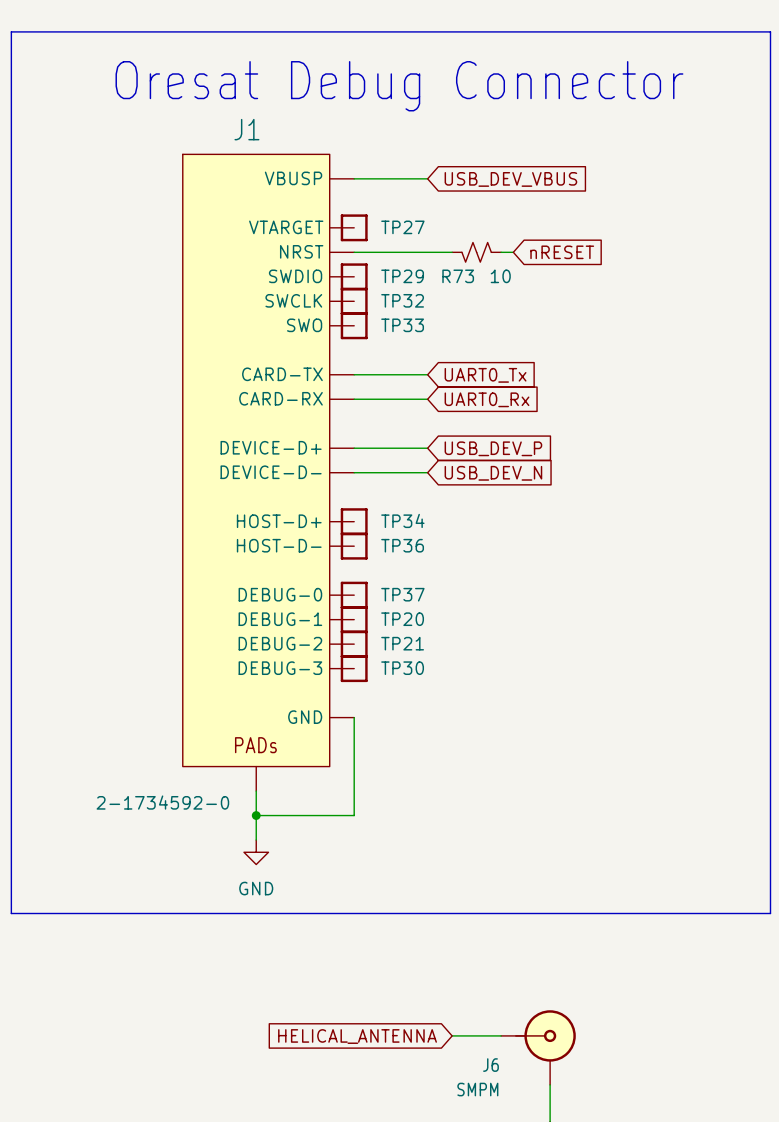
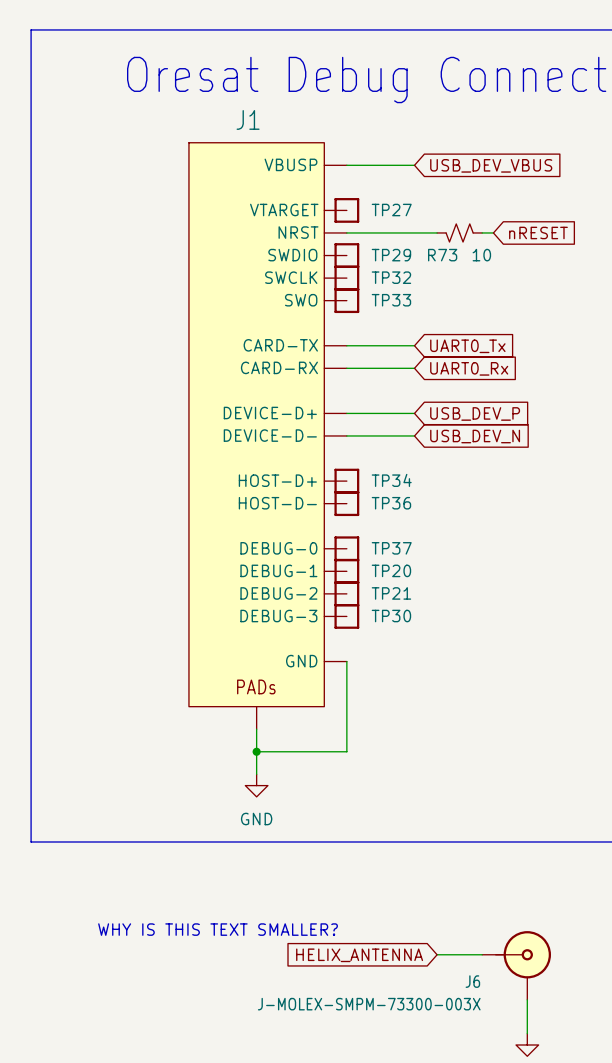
J1 text: 2-1734592-0 (162, 802) -> none
text: none -> WHY IS THIS TEXT SMALLER? (218, 929)
global label: HELICAL_ANTENNA (357, 1036) -> HELIX_ANTENNA (359, 955)
J6 value: SMPM (477, 1089) -> J-MOLEX-SMPM-73300-003X (369, 1004)

